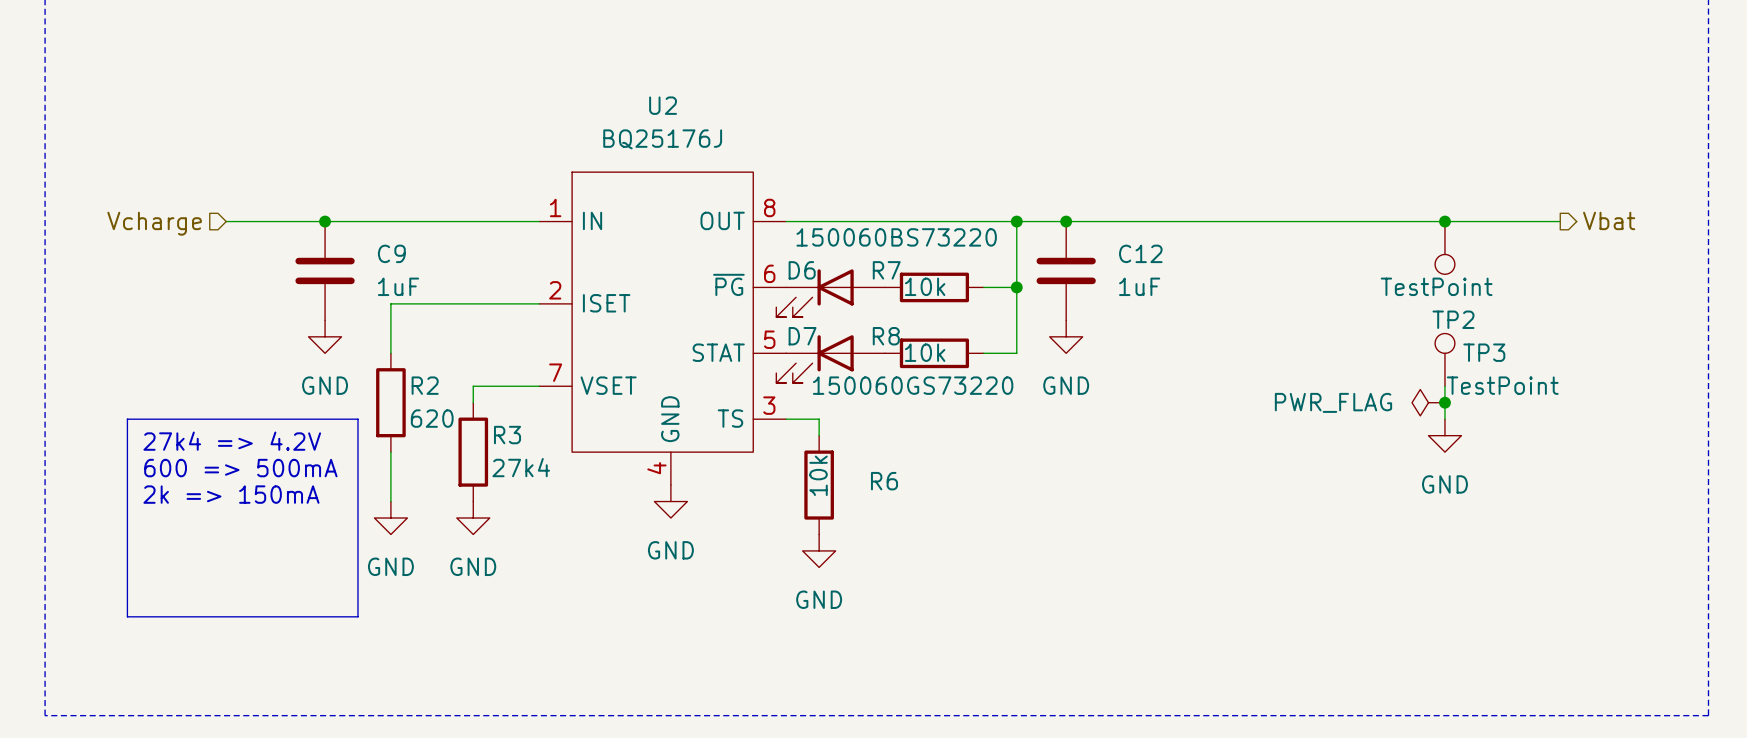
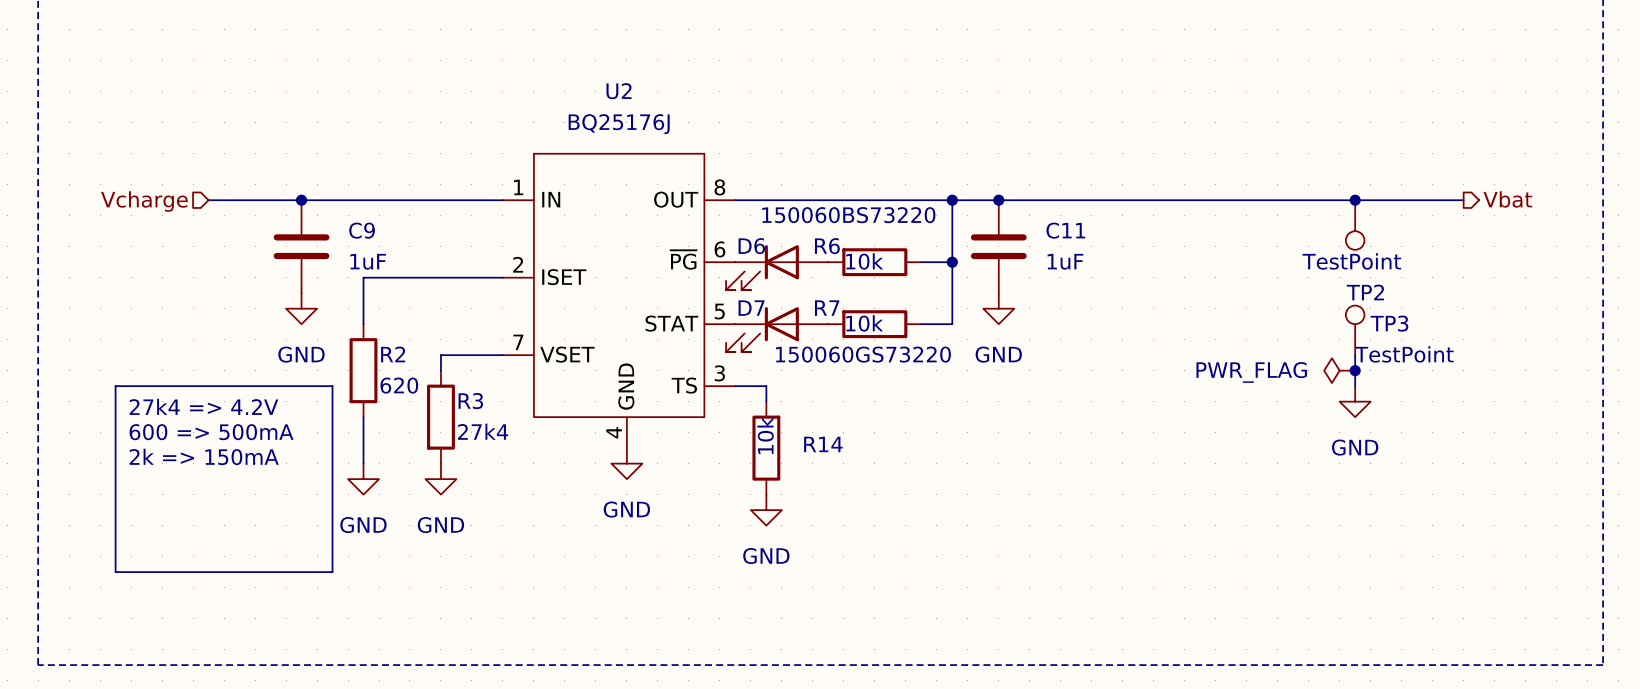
C12 name: C12 (1140, 253) -> C11 (1065, 230)
R7 name: R7 (886, 270) -> R6 (827, 246)
R8 name: R8 (886, 336) -> R7 (827, 308)
R6 name: R6 (884, 481) -> R14 (823, 444)

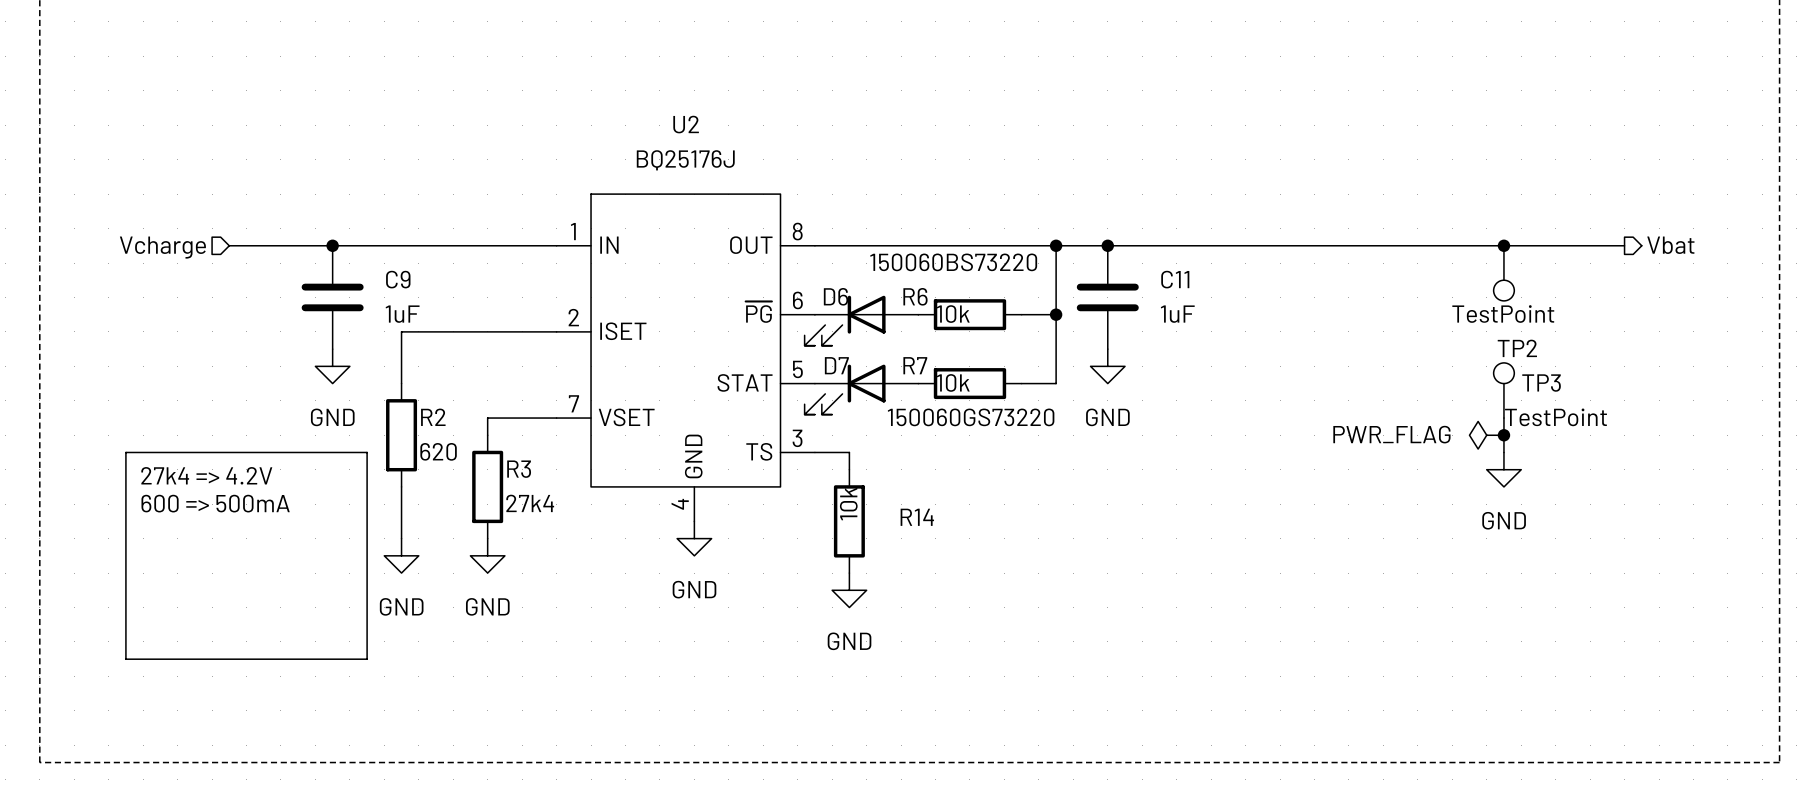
text: 2k => 150mA (204, 456) -> none

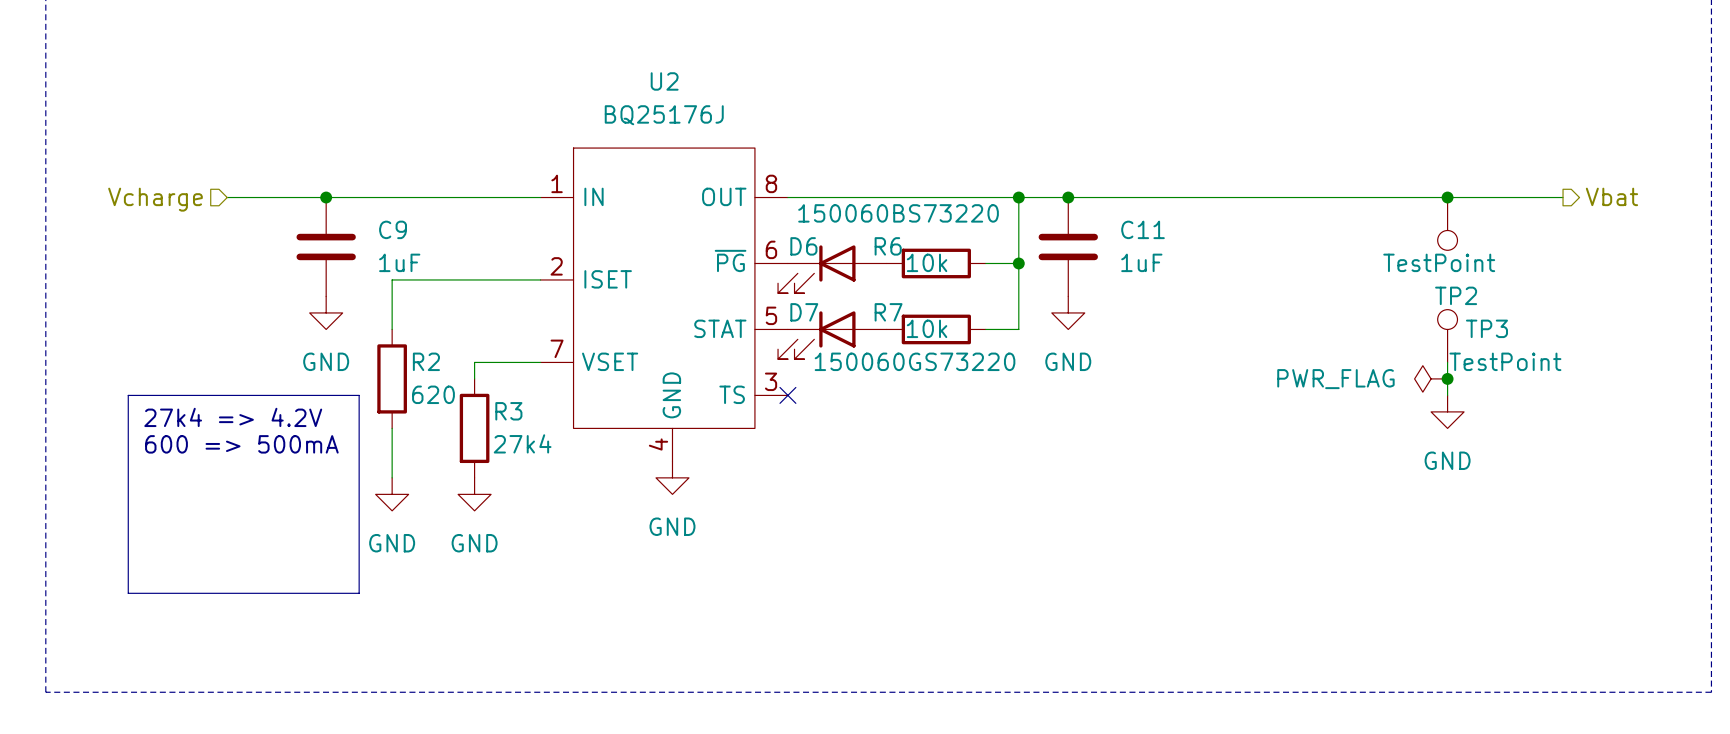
wire: (814, 452) (849, 452) (849, 469) -> none
no-connect mark: none -> (787, 395)
R14: 10k (849, 521) -> none
power symbol: GND (849, 590) -> none

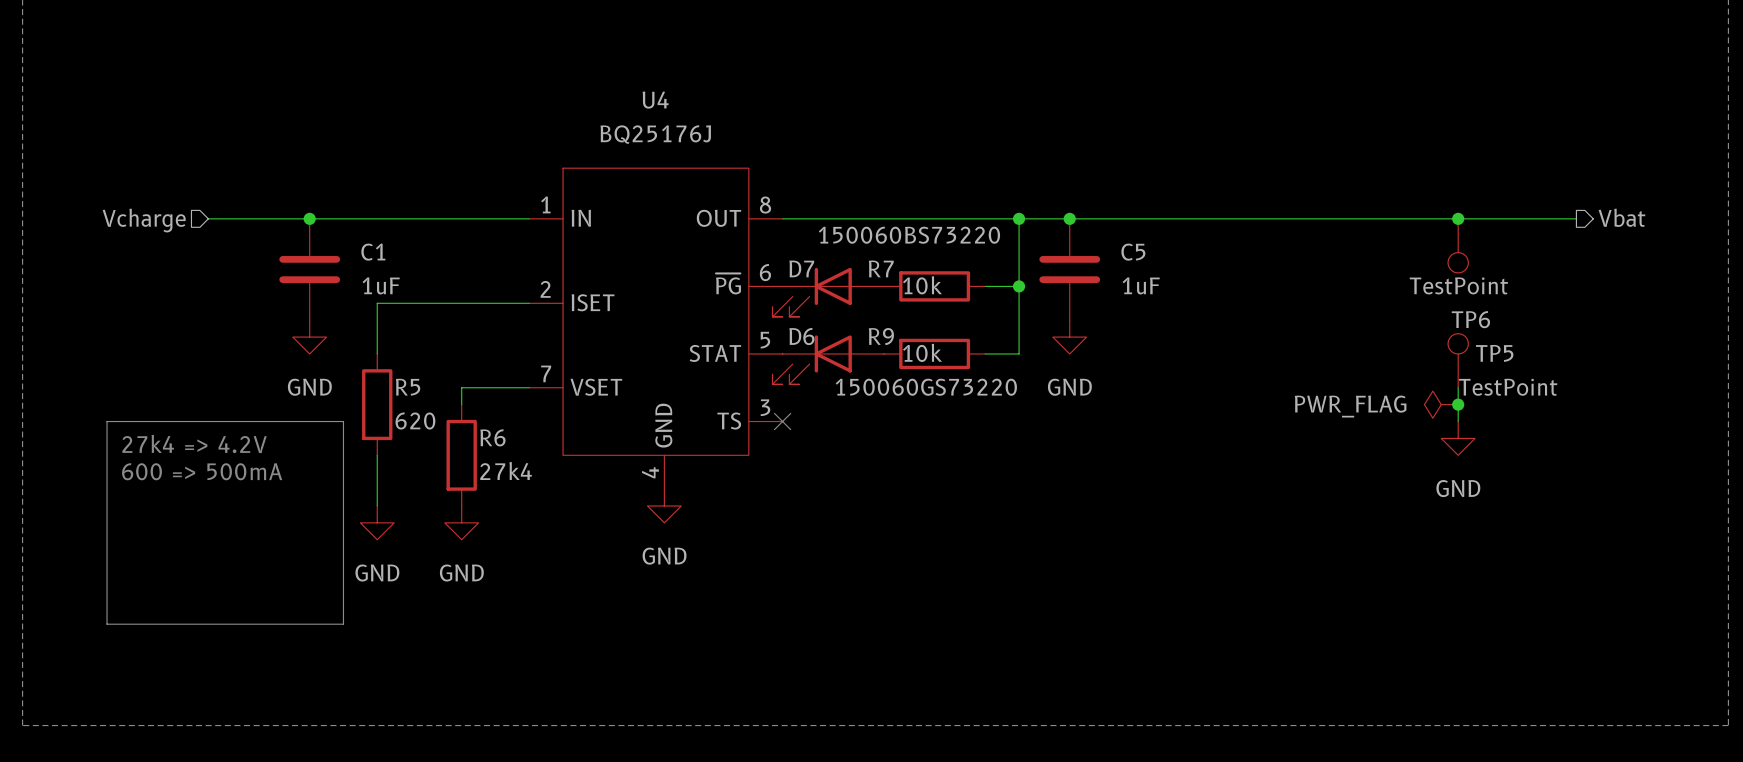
U2 name: U2 (664, 81) -> U4 (655, 100)
C9 name: C9 (393, 229) -> C1 (373, 252)
C11 name: C11 (1143, 229) -> C5 (1133, 252)
D6 name: D6 (803, 246) -> D7 (801, 268)
R6 name: R6 (888, 246) -> R7 (881, 268)
TP2 name: TP2 (1456, 295) -> TP6 (1470, 319)
D7 name: D7 (804, 312) -> D6 (801, 336)
R7 name: R7 (888, 312) -> R9 (881, 336)
TP3 name: TP3 (1486, 328) -> TP5 (1494, 353)
R2 name: R2 (426, 361) -> R5 (408, 387)
R3 name: R3 (508, 411) -> R6 (492, 437)

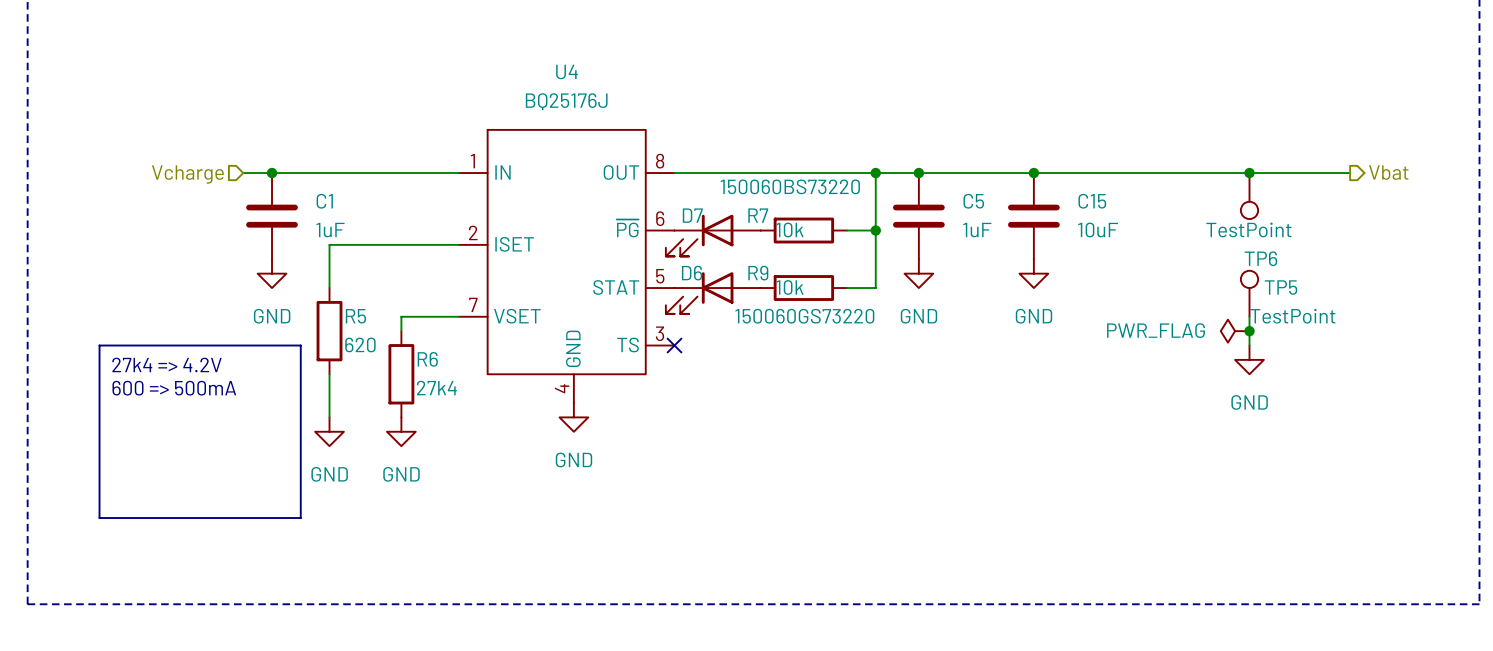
wire: (208, 218) (275, 218) -> none
junction: none -> (1033, 173)
hierarchical label position: Vcharge (144, 220) -> Vcharge (187, 174)
C15: none -> 10uF (1033, 216)
power symbol: none -> GND (1033, 273)

